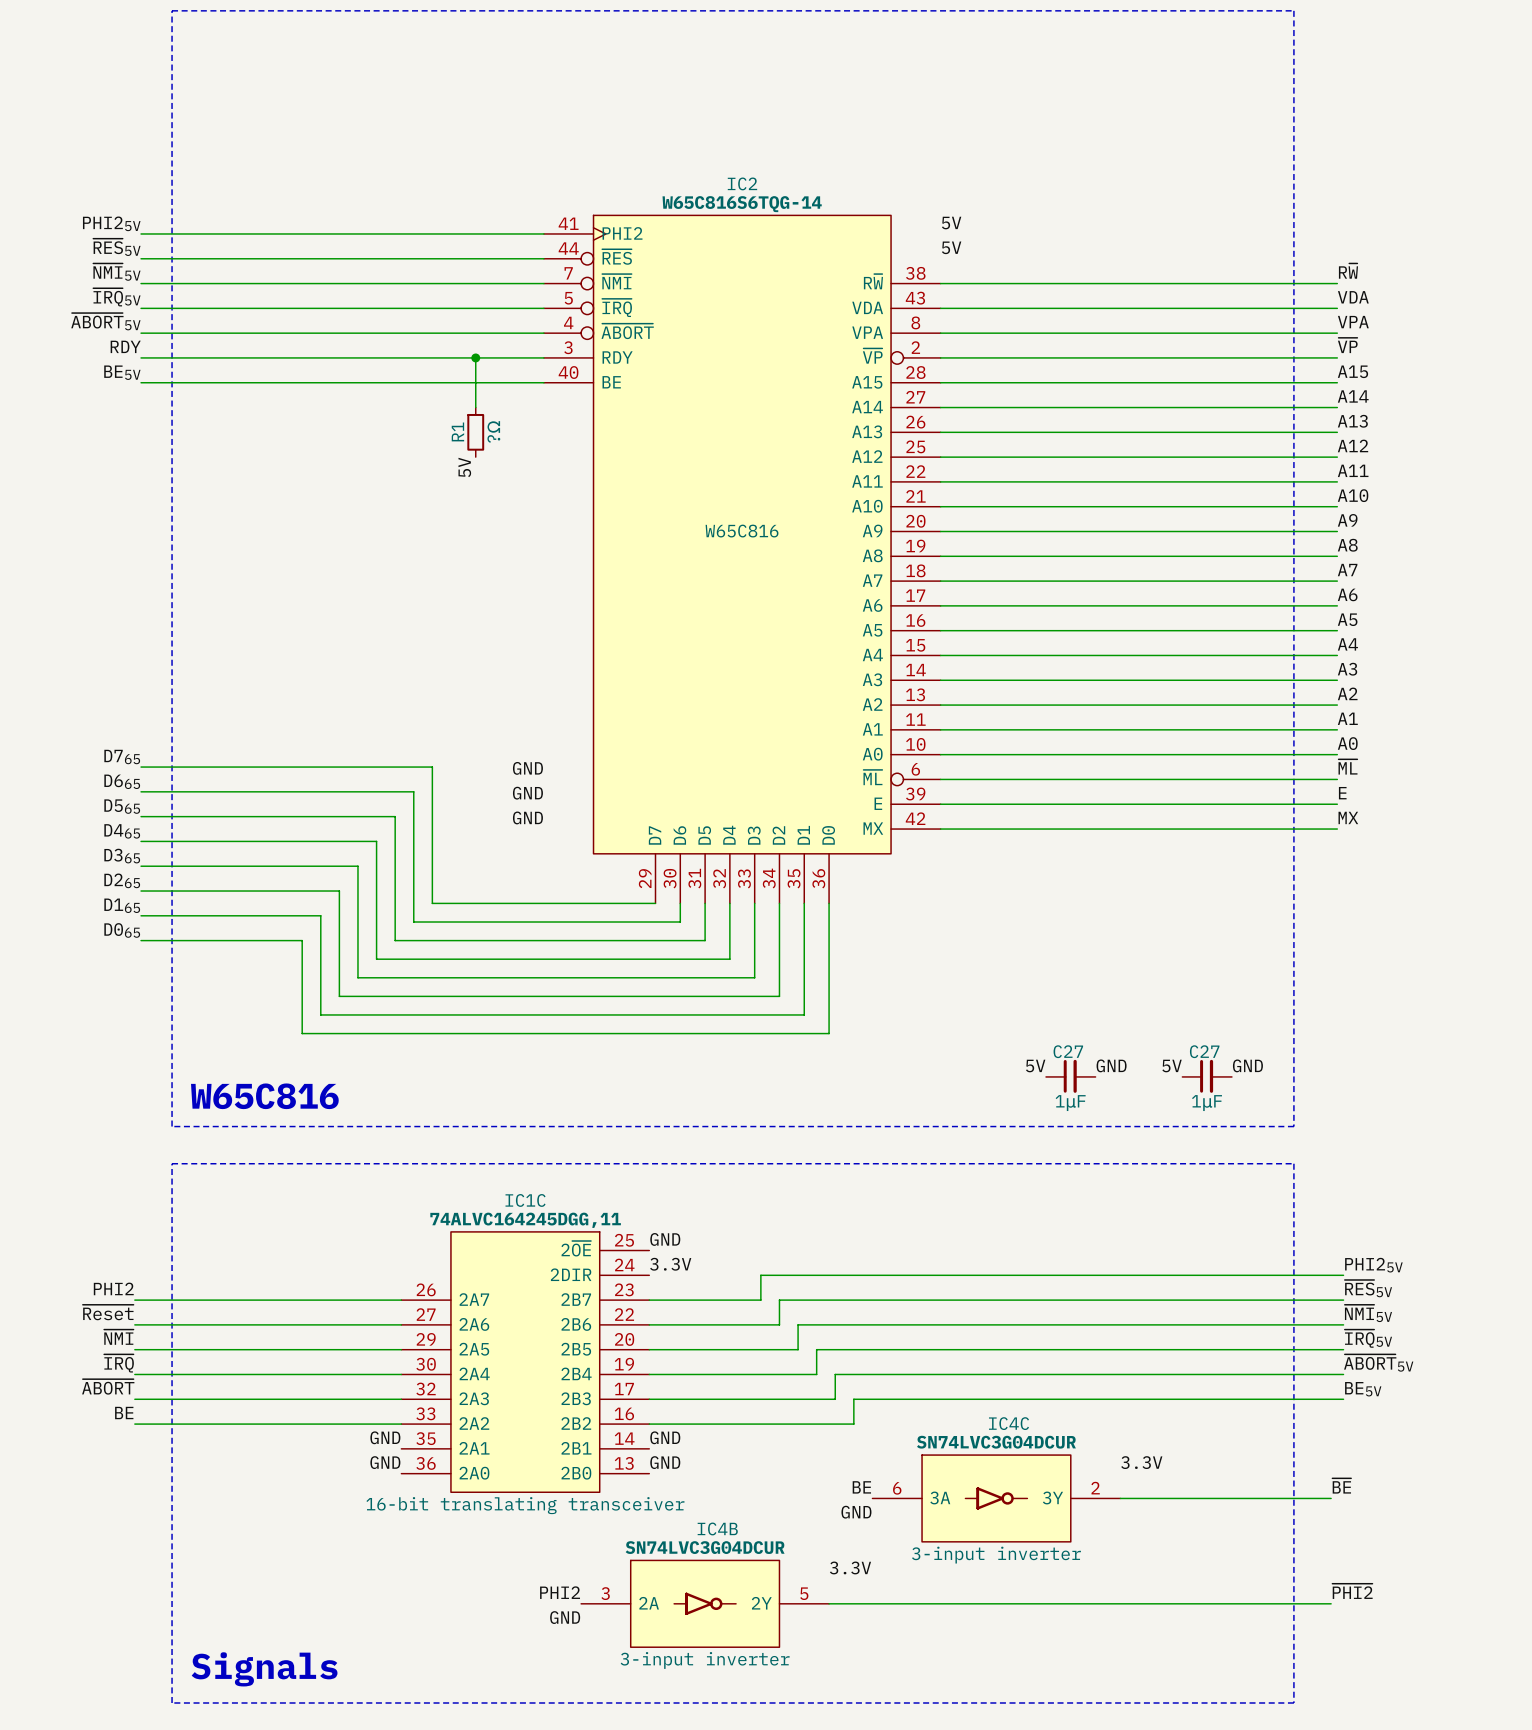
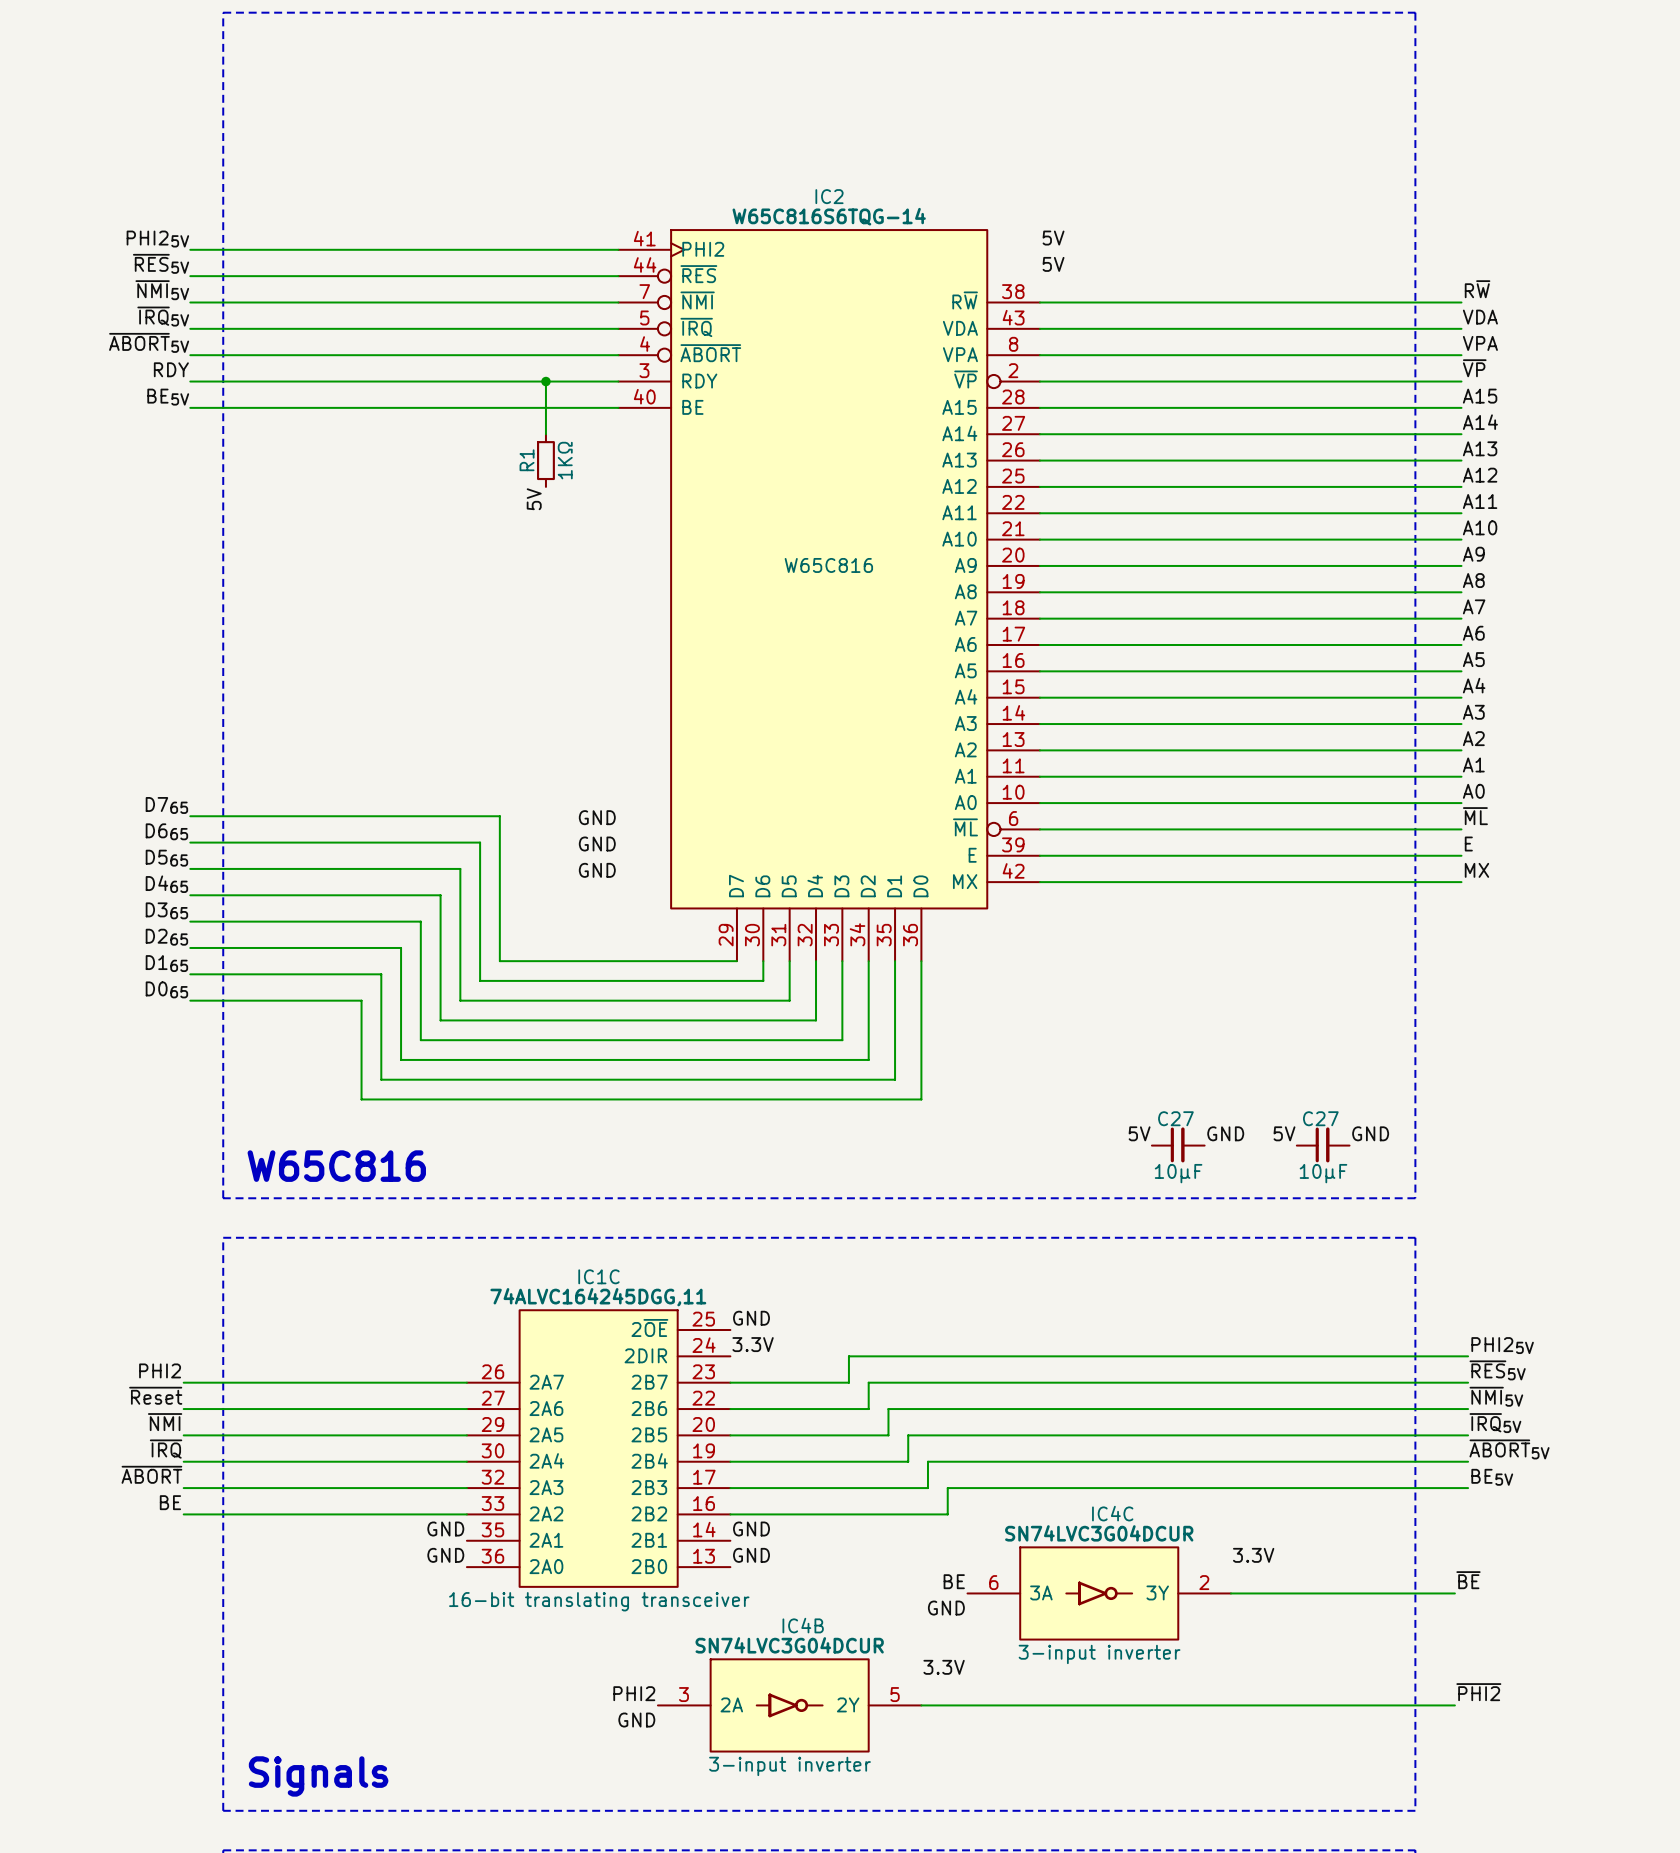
R1 value: ?Ω (493, 431) -> 1KΩ (565, 460)
C27 value: 1μF (1070, 1103) -> 10μF (1178, 1173)
C27 value: 1μF (1207, 1103) -> 10μF (1323, 1173)

